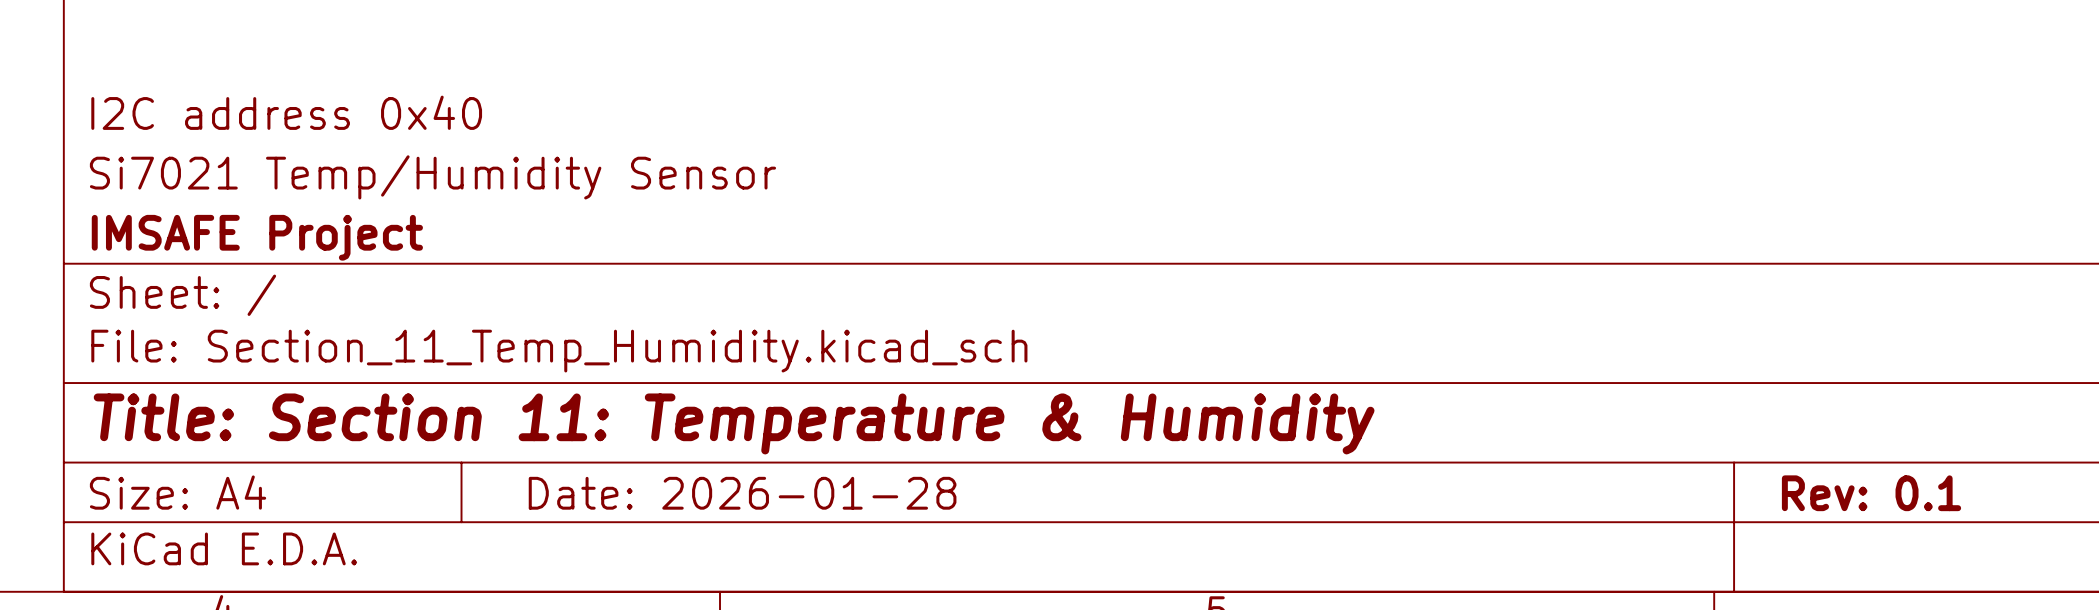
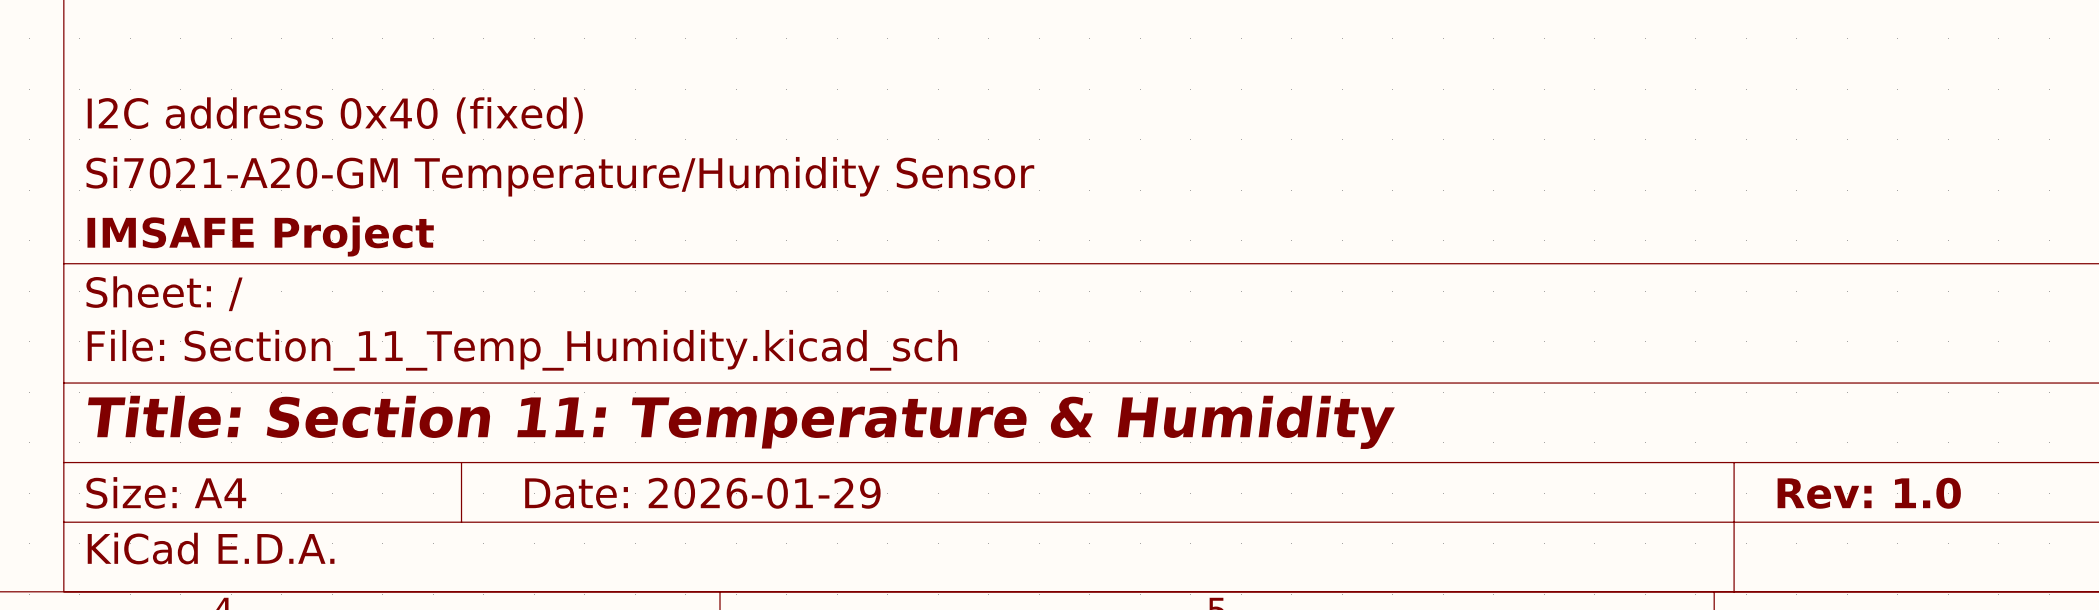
title block: I2C address 0x40 (286, 112) -> I2C address 0x40 (fixed) (335, 115)
title block: Si7021 Temp/Humidity Sensor (432, 177) -> Si7021-A20-GM Temperature/Humidity Sensor (560, 176)
title block: Date: 2026-01-28 (742, 493) -> Date: 2026-01-29 (702, 493)
title block: Rev: 0.1 (1871, 493) -> Rev: 1.0 (1869, 493)

